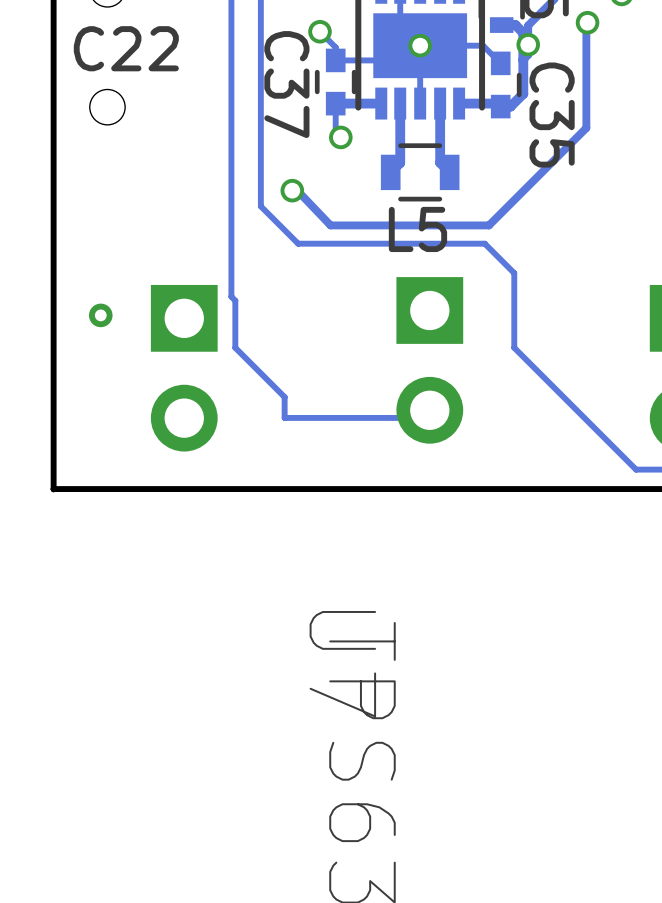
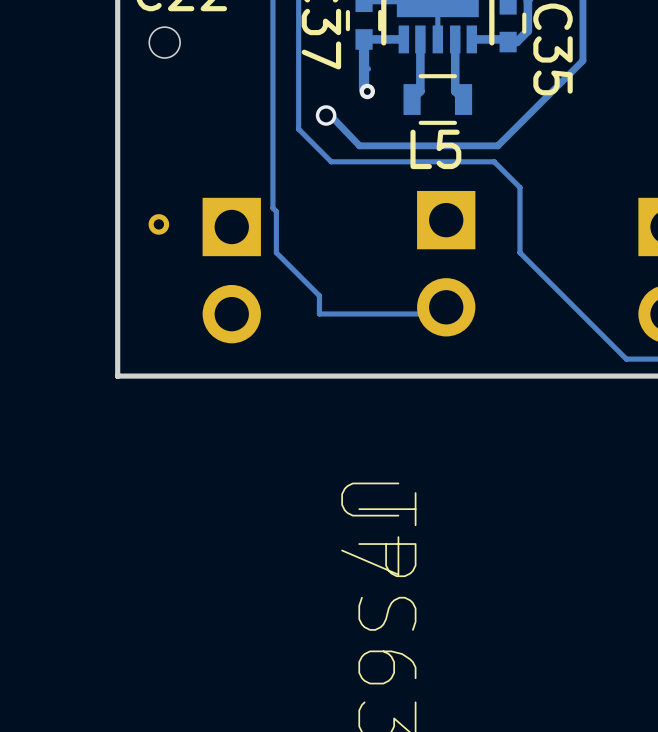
track: none -> (364, 39) (364, 88) (367, 91)
via: (340, 137) -> none
via: none -> (367, 91)

